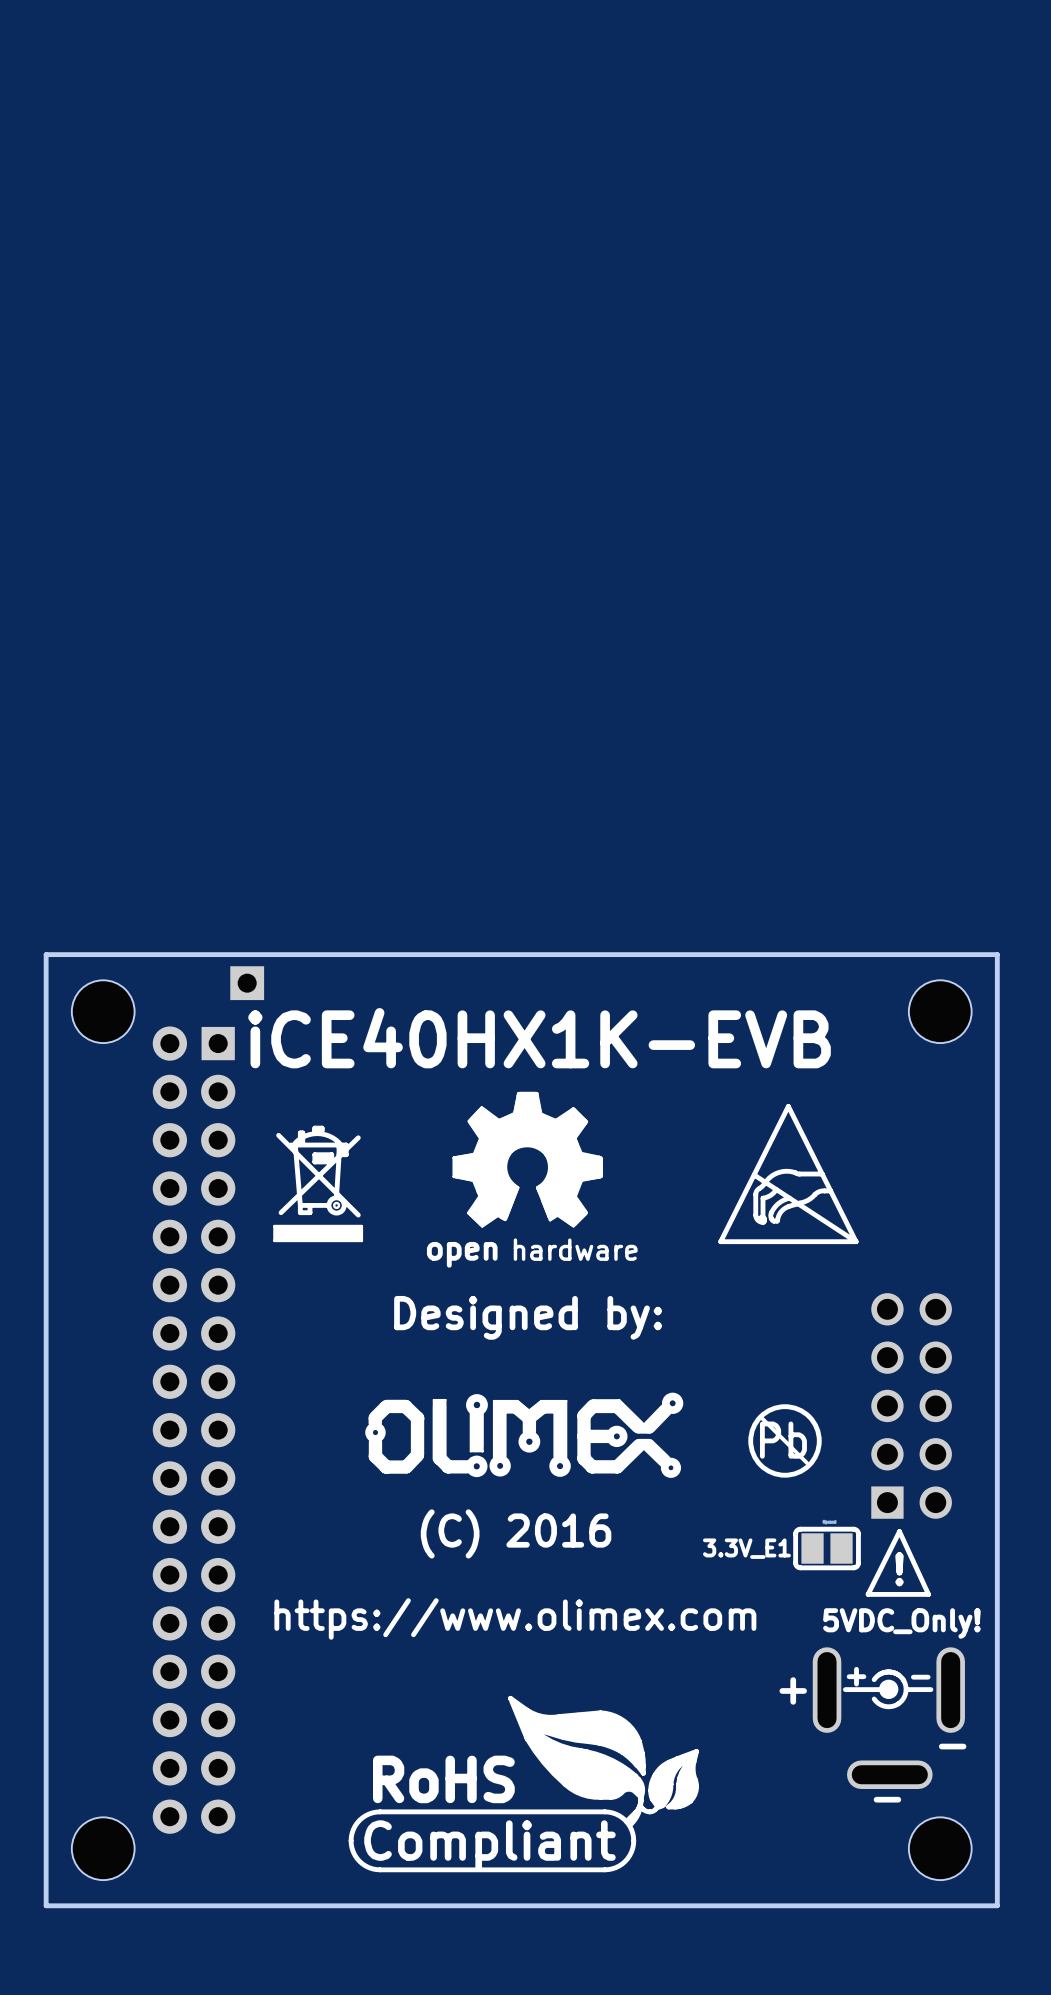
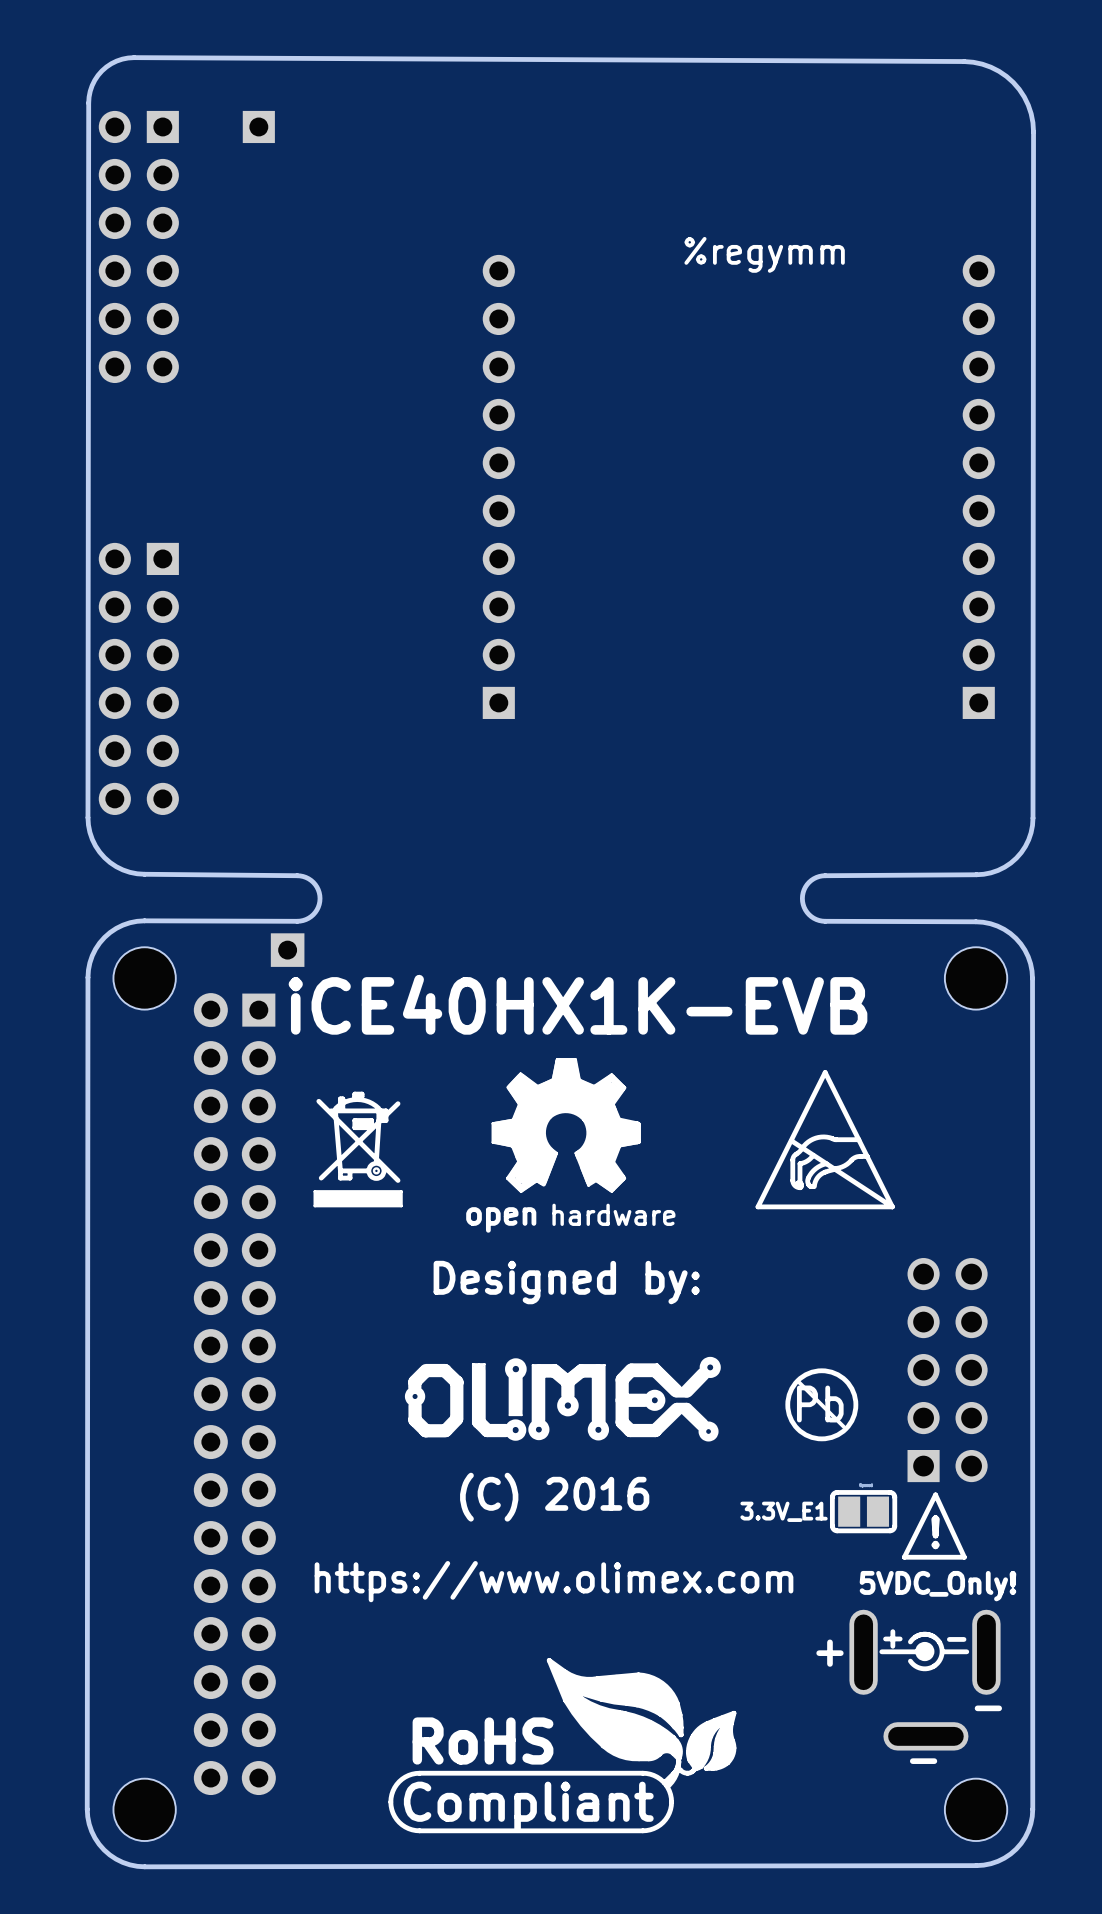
part: none -> (258, 126)
part: none -> (138, 246)
text: none -> %regymm (764, 254)
part: none -> (498, 486)
part: none -> (978, 486)
part: none -> (138, 678)
board edge: (997, 954) (997, 1905) (46, 1905) (46, 954) (997, 954) -> (134, 57) (964, 61) (982, 64) (1006, 76) (1019, 89) (1028, 105) (1033, 131) (1033, 818) (1031, 832) (1025, 846) (1016, 858) (1004, 867) (991, 872) (976, 874) (822, 875) (809, 882) (804, 889) (802, 898) (804, 907) (809, 914) (822, 921) (975, 921) (990, 923) (1004, 929) (1015, 938) (1024, 950) (1030, 963) (1032, 978) (1032, 1809) (1030, 1823) (1021, 1843) (1010, 1853) (997, 1861) (976, 1865) (144, 1866) (129, 1864) (116, 1859) (99, 1844) (91, 1831) (87, 1809) (87, 977) (89, 962) (95, 949) (104, 937) (116, 928) (129, 922) (144, 920) (300, 921) (313, 914) (318, 907) (320, 898) (318, 889) (313, 882) (300, 875) (144, 874) (129, 872) (116, 866) (104, 857) (95, 845) (89, 832) (87, 817) (88, 102) (92, 85) (101, 70) (116, 61) (134, 57)

